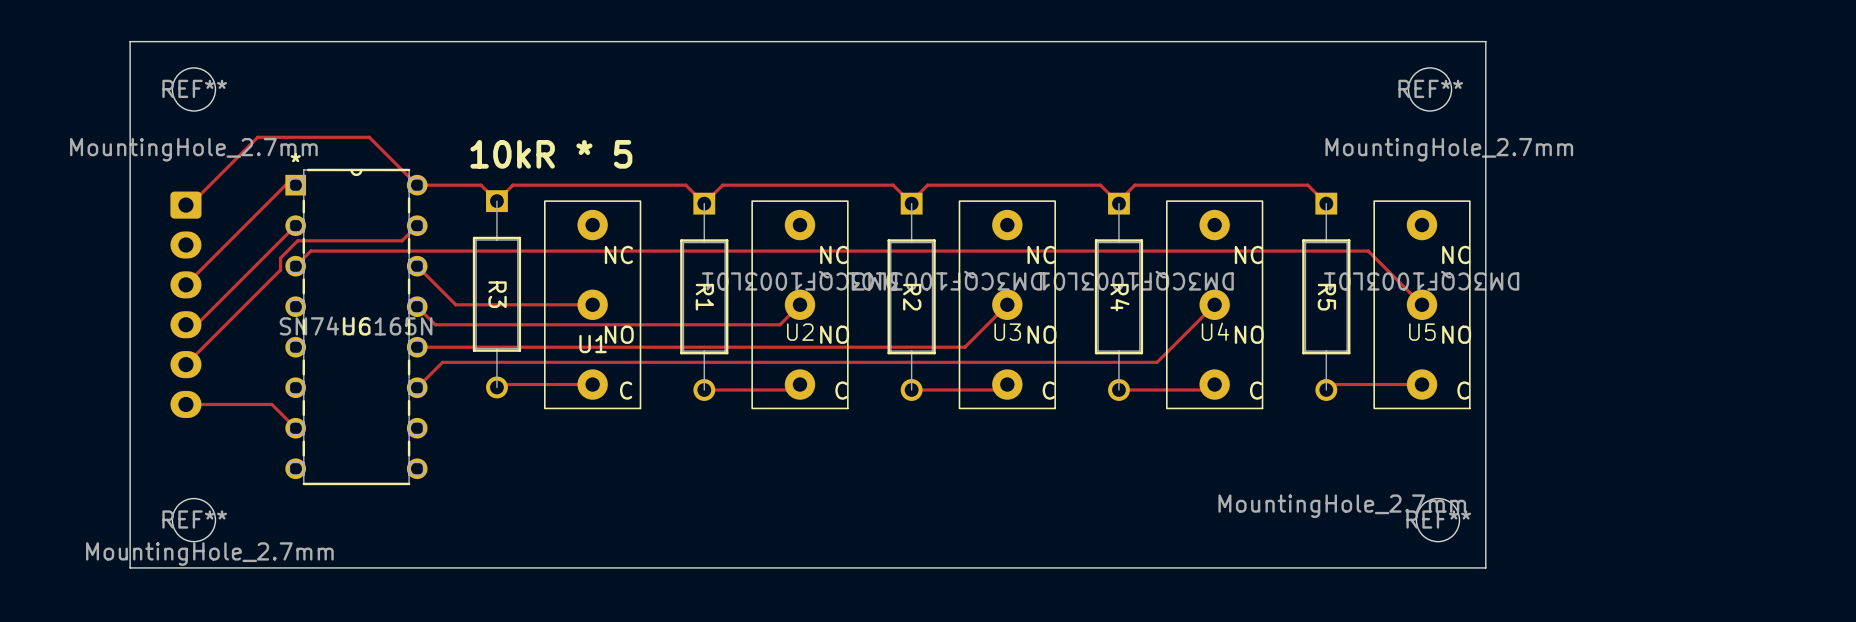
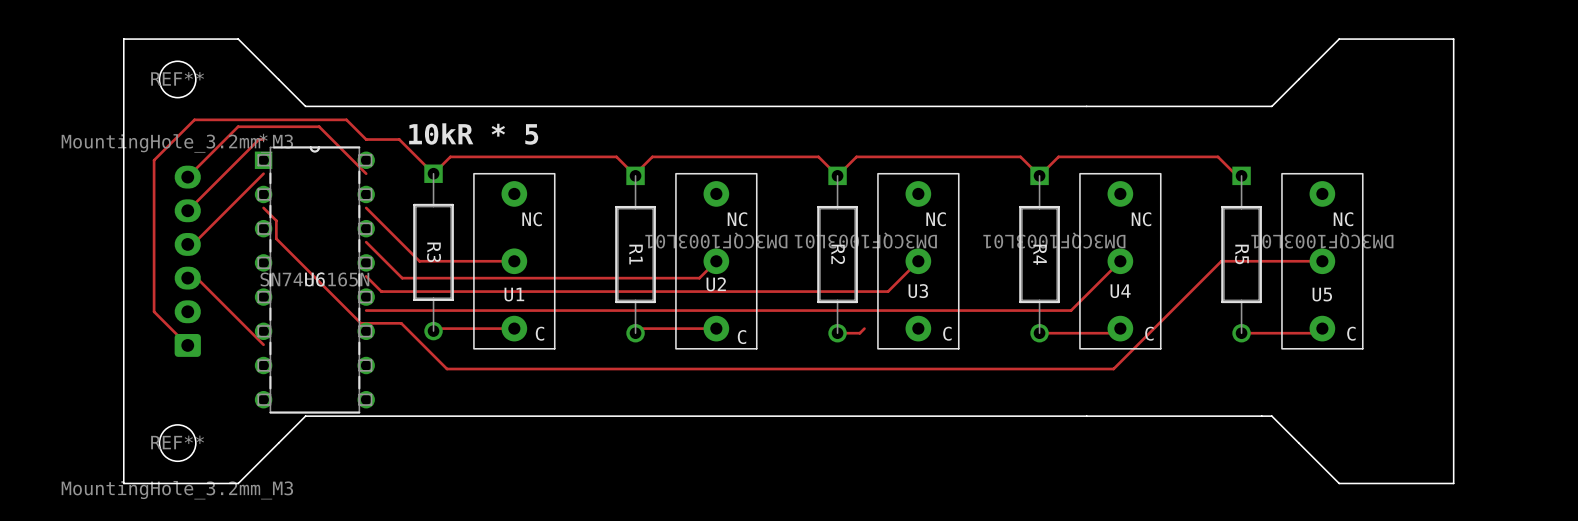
board edge: (265, 41) (1485, 41) (1485, 567) (265, 567) -> (238, 39) (305, 106) (1271, 106) (1339, 39) (1453, 39) (1453, 483) (1339, 483) (1271, 416) (305, 416) (238, 483)
REF**: MountingHole_2.7mm (1429, 89) -> none
track: (257, 137) (189, 205) (185, 205) -> (231, 119) (194, 119) (154, 160) (154, 311) (187, 345)
track: (369, 137) (417, 185) (481, 185) -> (325, 119) (346, 119) (366, 139) (399, 139) (420, 160)
REF** value: MountingHole_2.7mm (193, 149) -> MountingHole_3.2mm_M3 (177, 143)
track: none -> (263, 139) (259, 139) (187, 210)
track: (295, 185) (285, 185) (185, 284) -> none
track: (512, 185) (685, 185) (704, 203) (722, 185) (893, 185) (911, 203) (911, 201) (927, 185) (1100, 185) (1118, 203) (1118, 201) (1134, 185) (1307, 185) (1326, 203) -> (447, 160) (450, 156) (616, 156) (635, 175) (652, 156) (818, 156) (837, 175) (856, 156) (1020, 156) (1039, 175) (1058, 156) (1218, 156) (1236, 175) (1241, 175)
track: none -> (263, 173) (192, 244) (187, 244)
track: none -> (366, 173) (319, 126) (238, 126) (187, 177)
track: (295, 225) (196, 324) (185, 324) -> none
track: (417, 225) (402, 240) (297, 240) (280, 258) (280, 270) (185, 364) -> none
track: none -> (263, 207) (276, 220) (276, 238) (360, 323) (401, 323) (447, 369) (1113, 369) (1221, 261) (1322, 261)
text position: NC (834, 254) -> NC (737, 219)
text position: NC (1041, 254) -> NC (936, 219)
text: NC (1248, 254) -> none
text: none -> NC (1141, 219)
text: NC (1456, 254) -> none
text: none -> NC (1343, 219)
track: (295, 266) (310, 251) (1368, 251) (1422, 304) -> none
track: (417, 266) (455, 304) (480, 304) -> (366, 207) (419, 261)
R1 position: (704, 296) -> (635, 254)
R2 position: (911, 296) -> (837, 254)
R4 position: (1118, 296) -> (1039, 254)
R5 position: (1326, 296) -> (1241, 254)
part rotation: 0° (185, 304) -> 180° (187, 261)
track: (799, 304) (780, 324) -> (716, 261) (699, 278) (672, 278)
U2 position: (799, 304) -> (716, 261)
track: (1007, 304) (964, 347) (417, 347) -> none
U3 position: (1007, 304) -> (918, 261)
track: none -> (918, 261) (888, 291) (381, 291) (366, 276)
track: (1214, 304) (1157, 362) (442, 362) (417, 387) -> none
U4 position: (1214, 304) -> (1120, 261)
track: none -> (1120, 261) (1071, 310) (366, 310)
U5 position: (1422, 304) -> (1322, 261)
track: (417, 306) (435, 324) (459, 324) -> (366, 242) (402, 278)
track: none -> (187, 278) (196, 278) (263, 344)
U4 name position: U4 (1215, 331) -> U4 (1120, 291)
U3 name position: U3 (1007, 332) -> U3 (918, 291)
U5 name position: U5 (1422, 332) -> U5 (1322, 294)
text: NO (619, 334) -> none
text: NO (834, 334) -> none
text: NO (1041, 334) -> none
text: NO (1249, 334) -> none
text: NO (1456, 334) -> none
track: (799, 384) (794, 389) (704, 389) -> none
track: none -> (716, 328) (640, 328) (635, 333)
track: (1214, 384) (1209, 389) (1118, 389) -> (1120, 328) (1115, 333) (1039, 333)
track: (1422, 384) (1331, 384) (1326, 389) -> none
track: none -> (1322, 328) (1317, 333) (1241, 333)
track: (911, 389) (975, 389) -> none
text position: C (841, 390) -> C (742, 337)
text position: C (1048, 390) -> C (947, 333)
text: C (1256, 390) -> none
text: none -> C (1149, 333)
text: C (1463, 390) -> none
text: none -> C (1351, 333)
track: (185, 404) (271, 404) (295, 428) -> none
REF**: MountingHole_2.7mm (1437, 520) -> none
REF** value: MountingHole_2.7mm (209, 554) -> MountingHole_3.2mm_M3 (177, 490)

